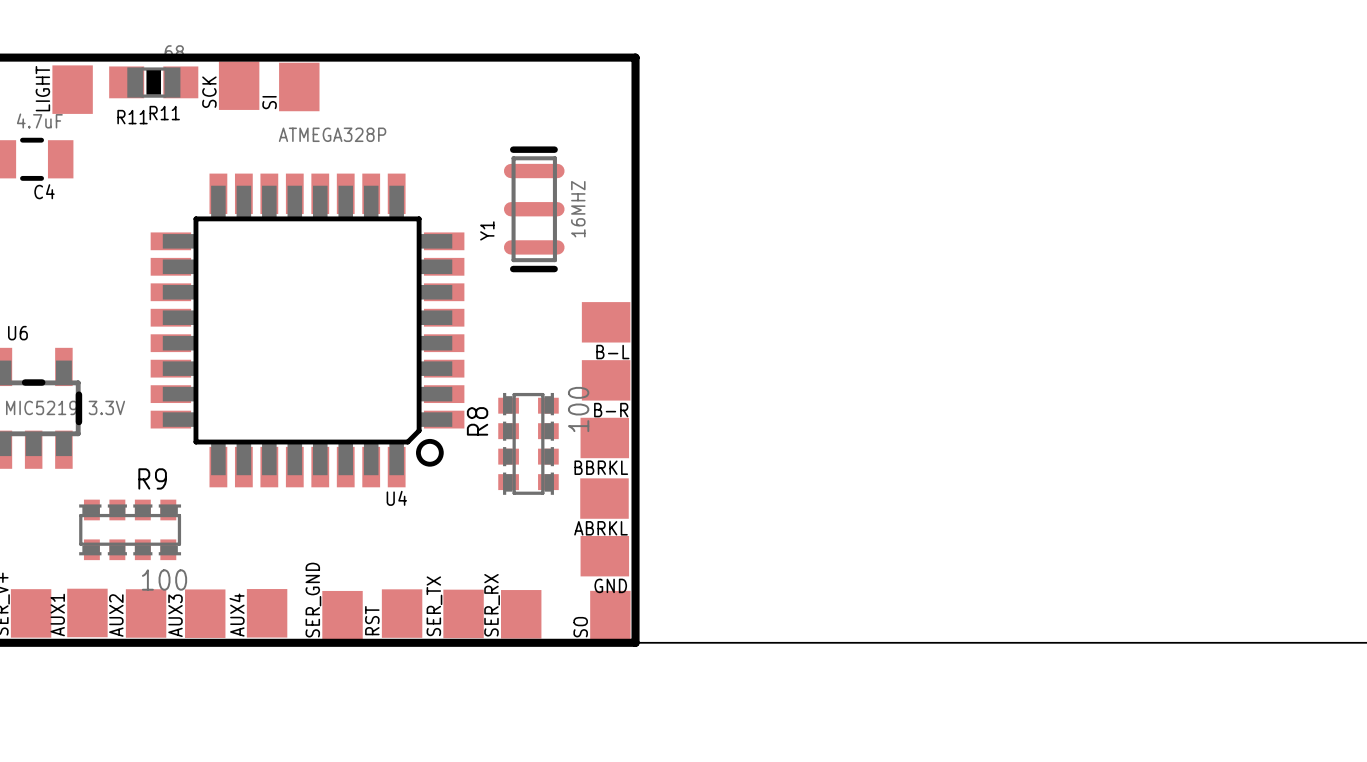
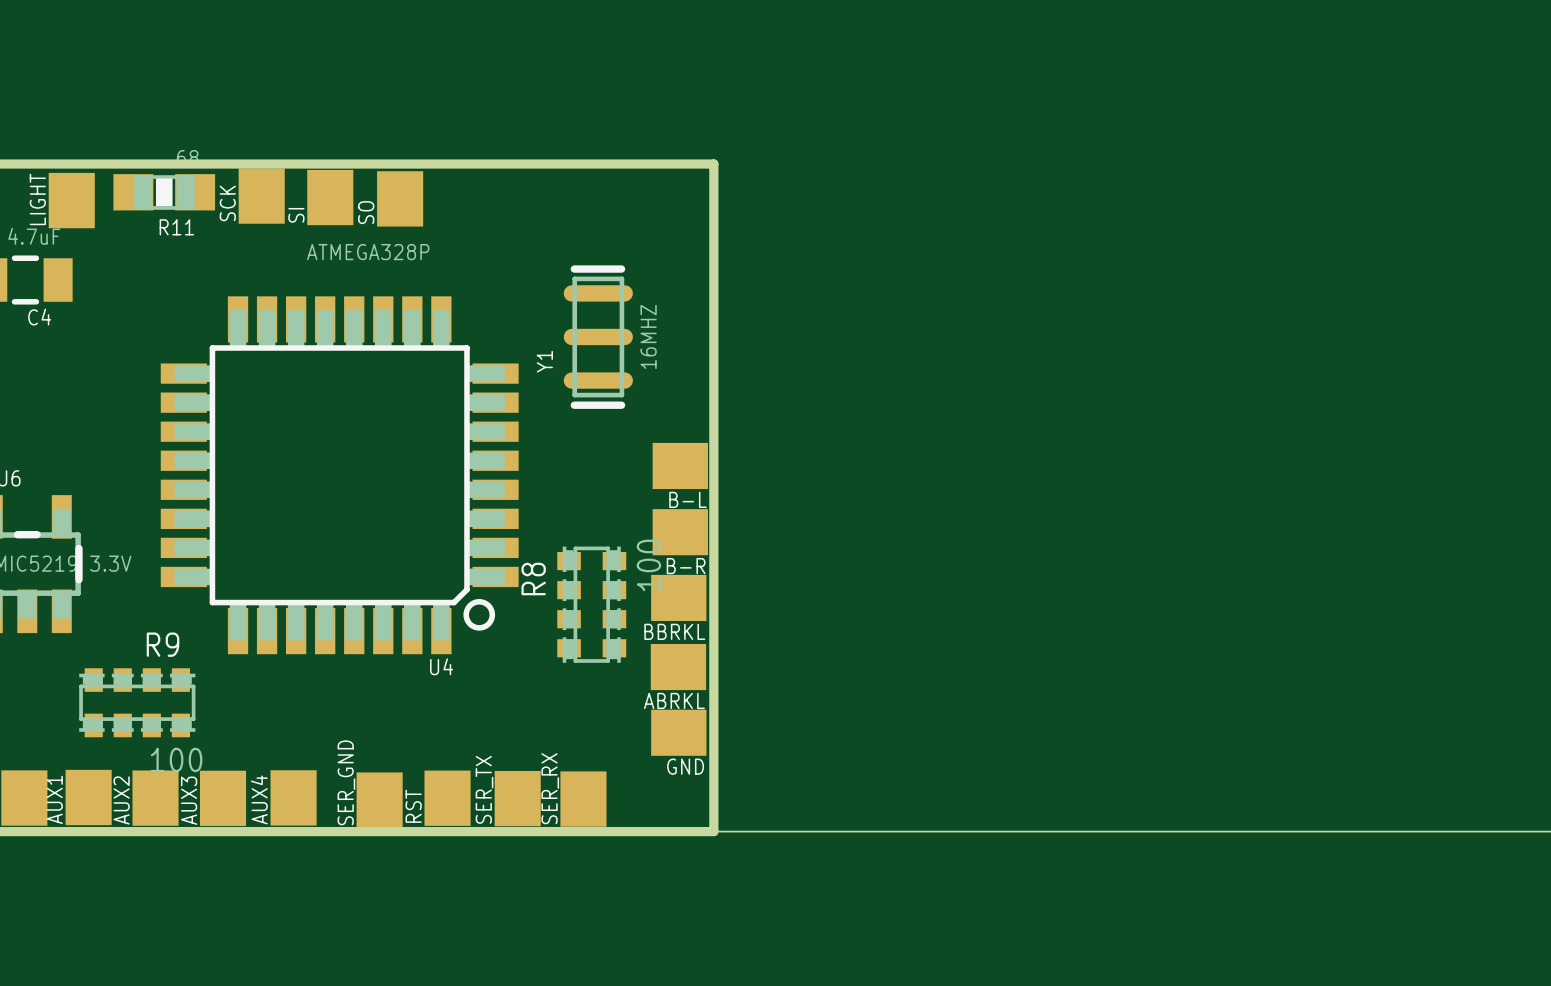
text: R11 (132, 117) -> none
SO position: (610, 615) -> (400, 198)

